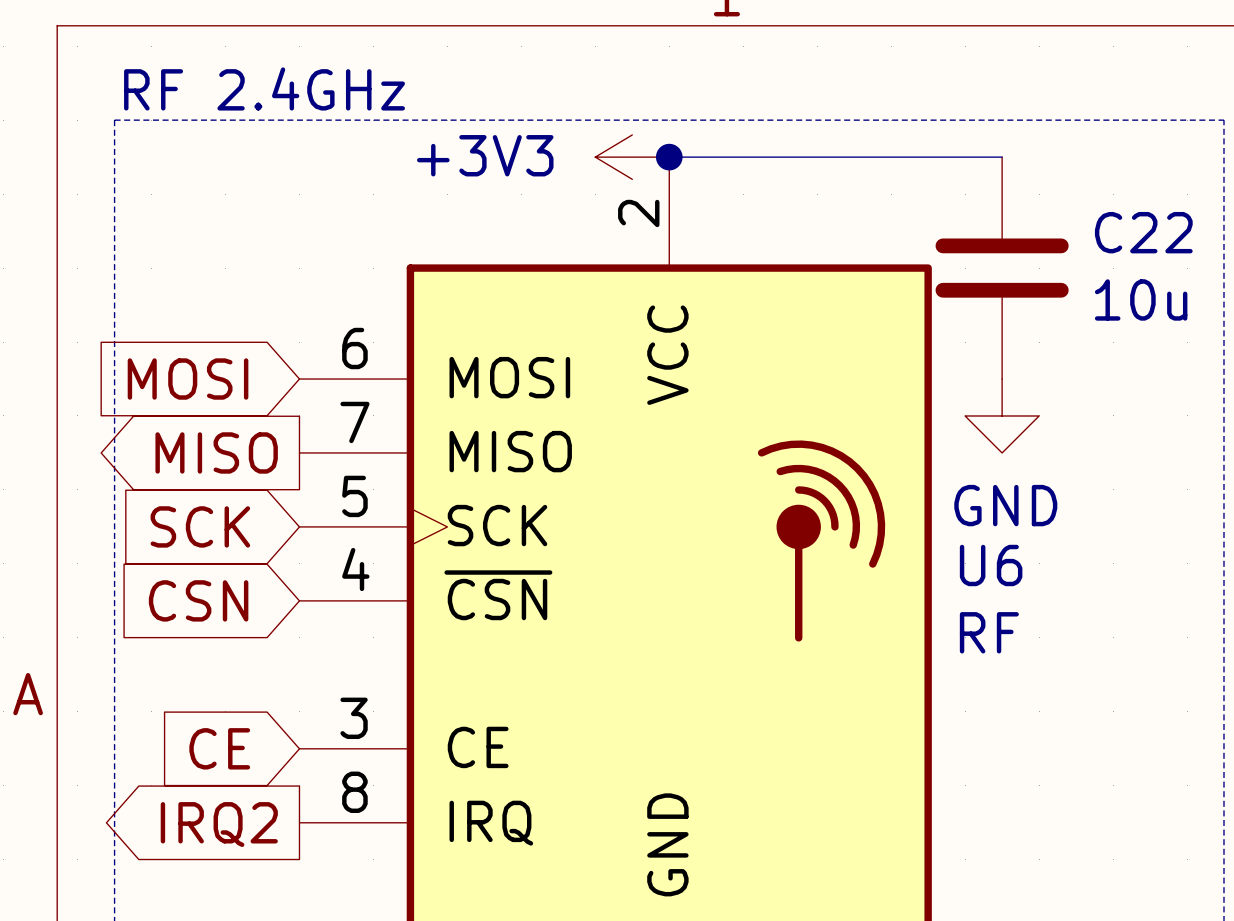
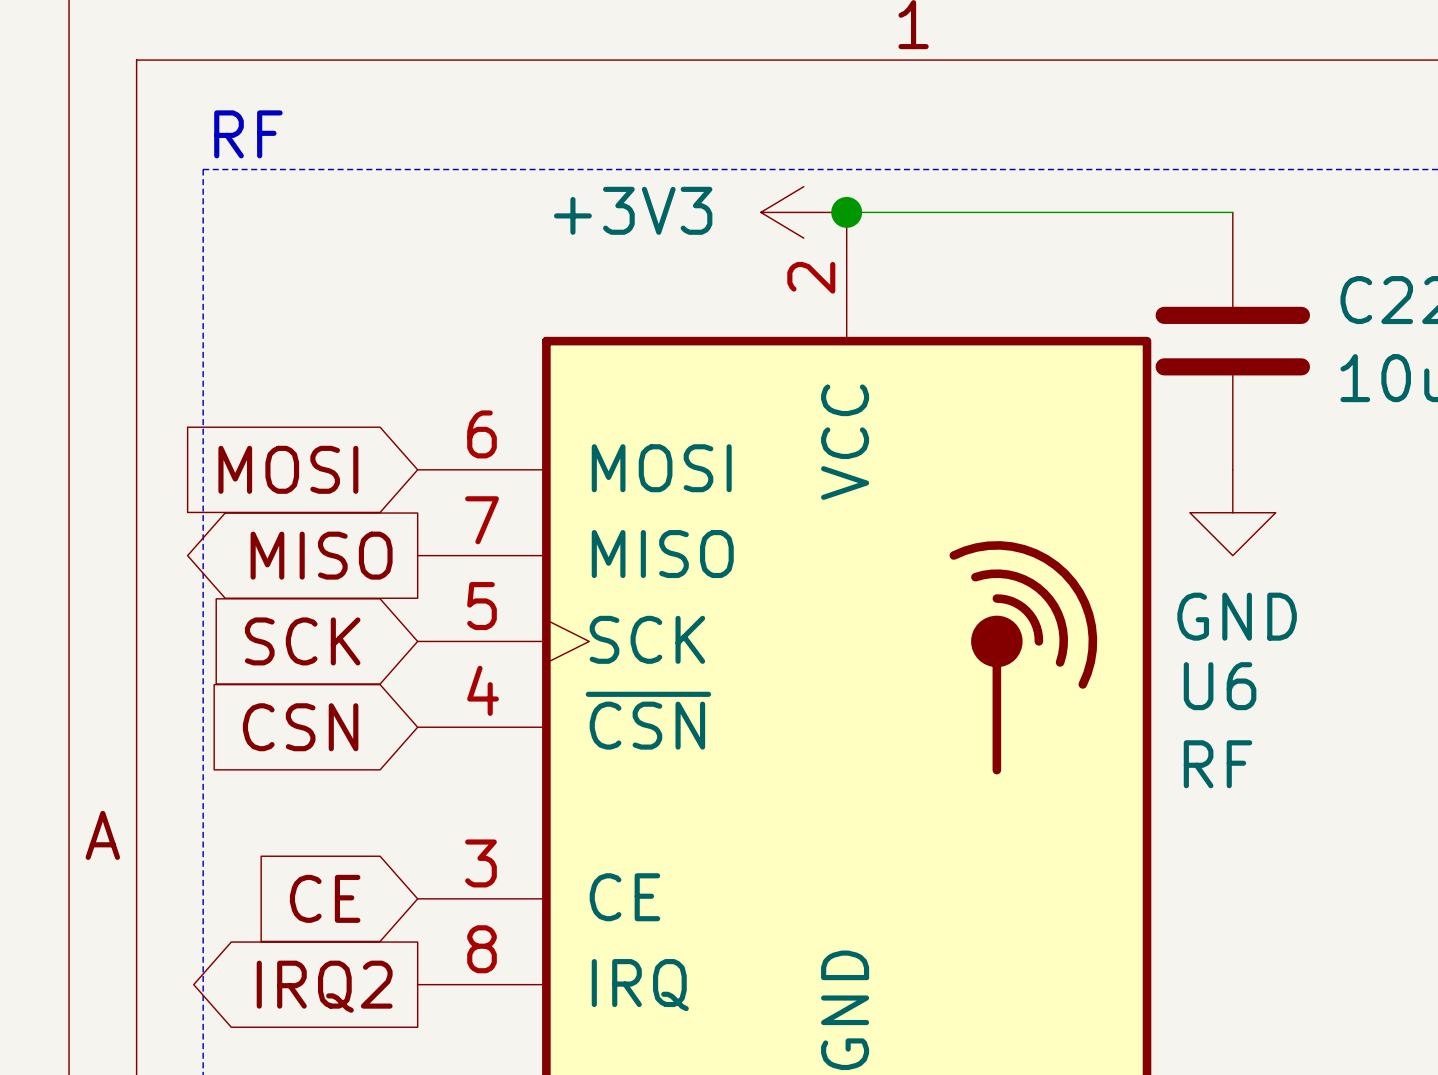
text: RF 2.4GHz (264, 88) -> RF (248, 134)

